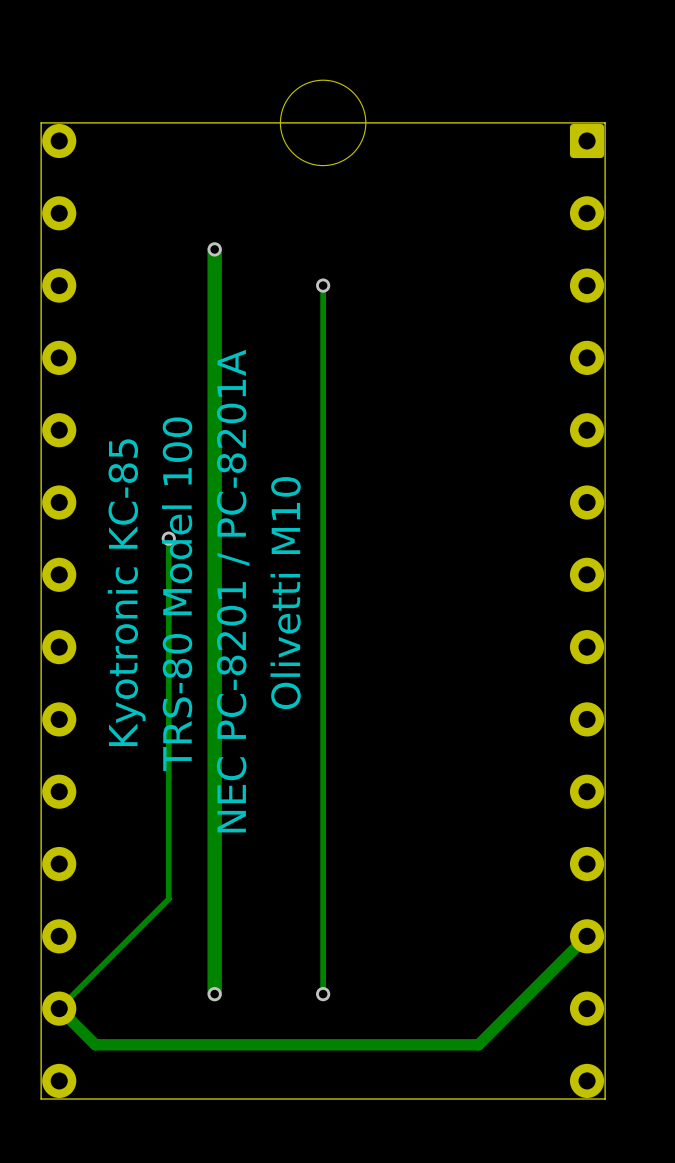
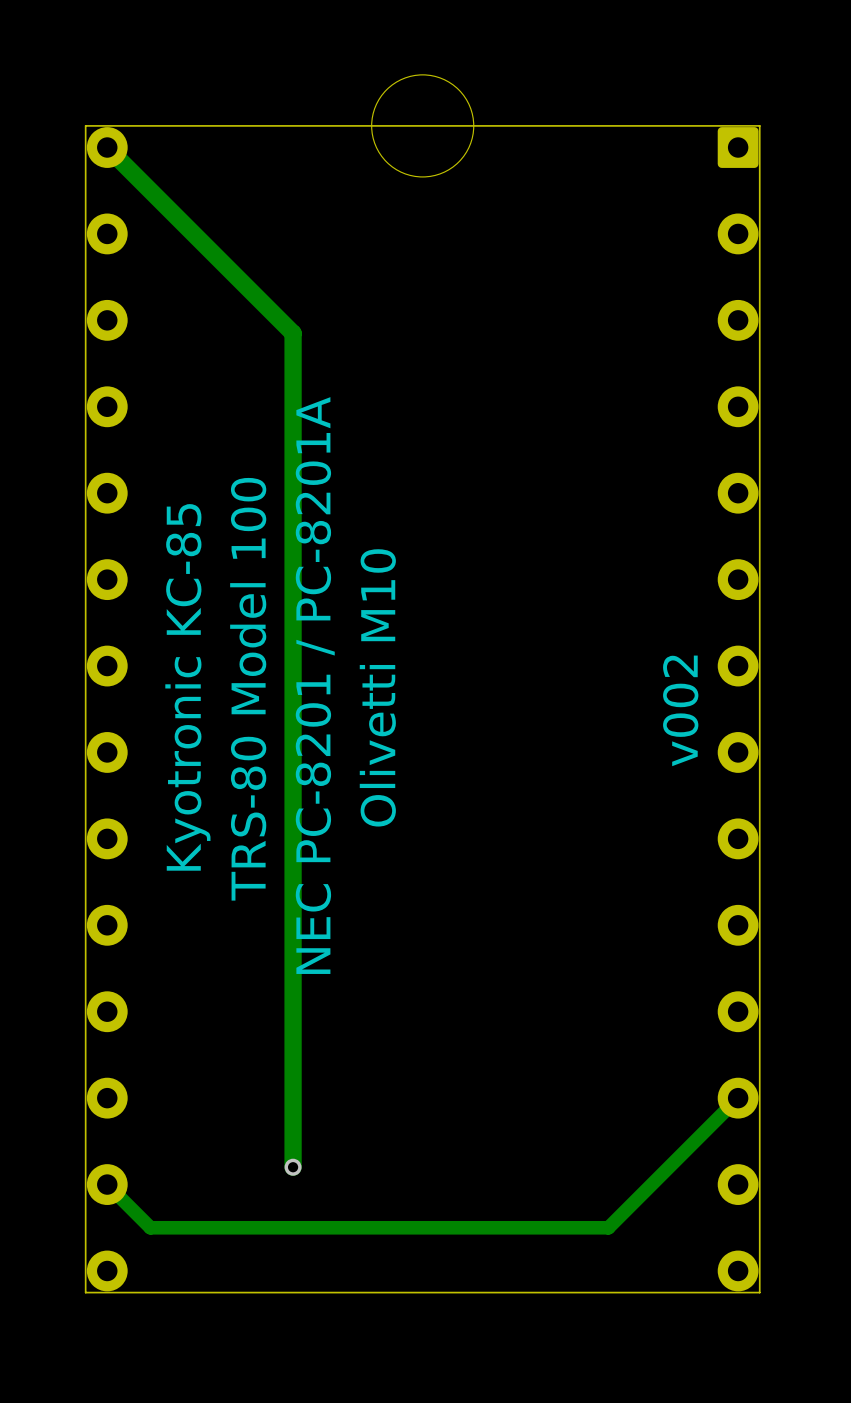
track: (214, 249) (214, 296) -> (107, 147) (293, 333)
via: (214, 249) -> none
track: (323, 285) (323, 994) -> none
via: (323, 285) -> none
track: (168, 538) (168, 899) (59, 1008) -> none
via: (168, 538) -> none
text: none -> v002 (680, 710)
via: (323, 994) -> none

